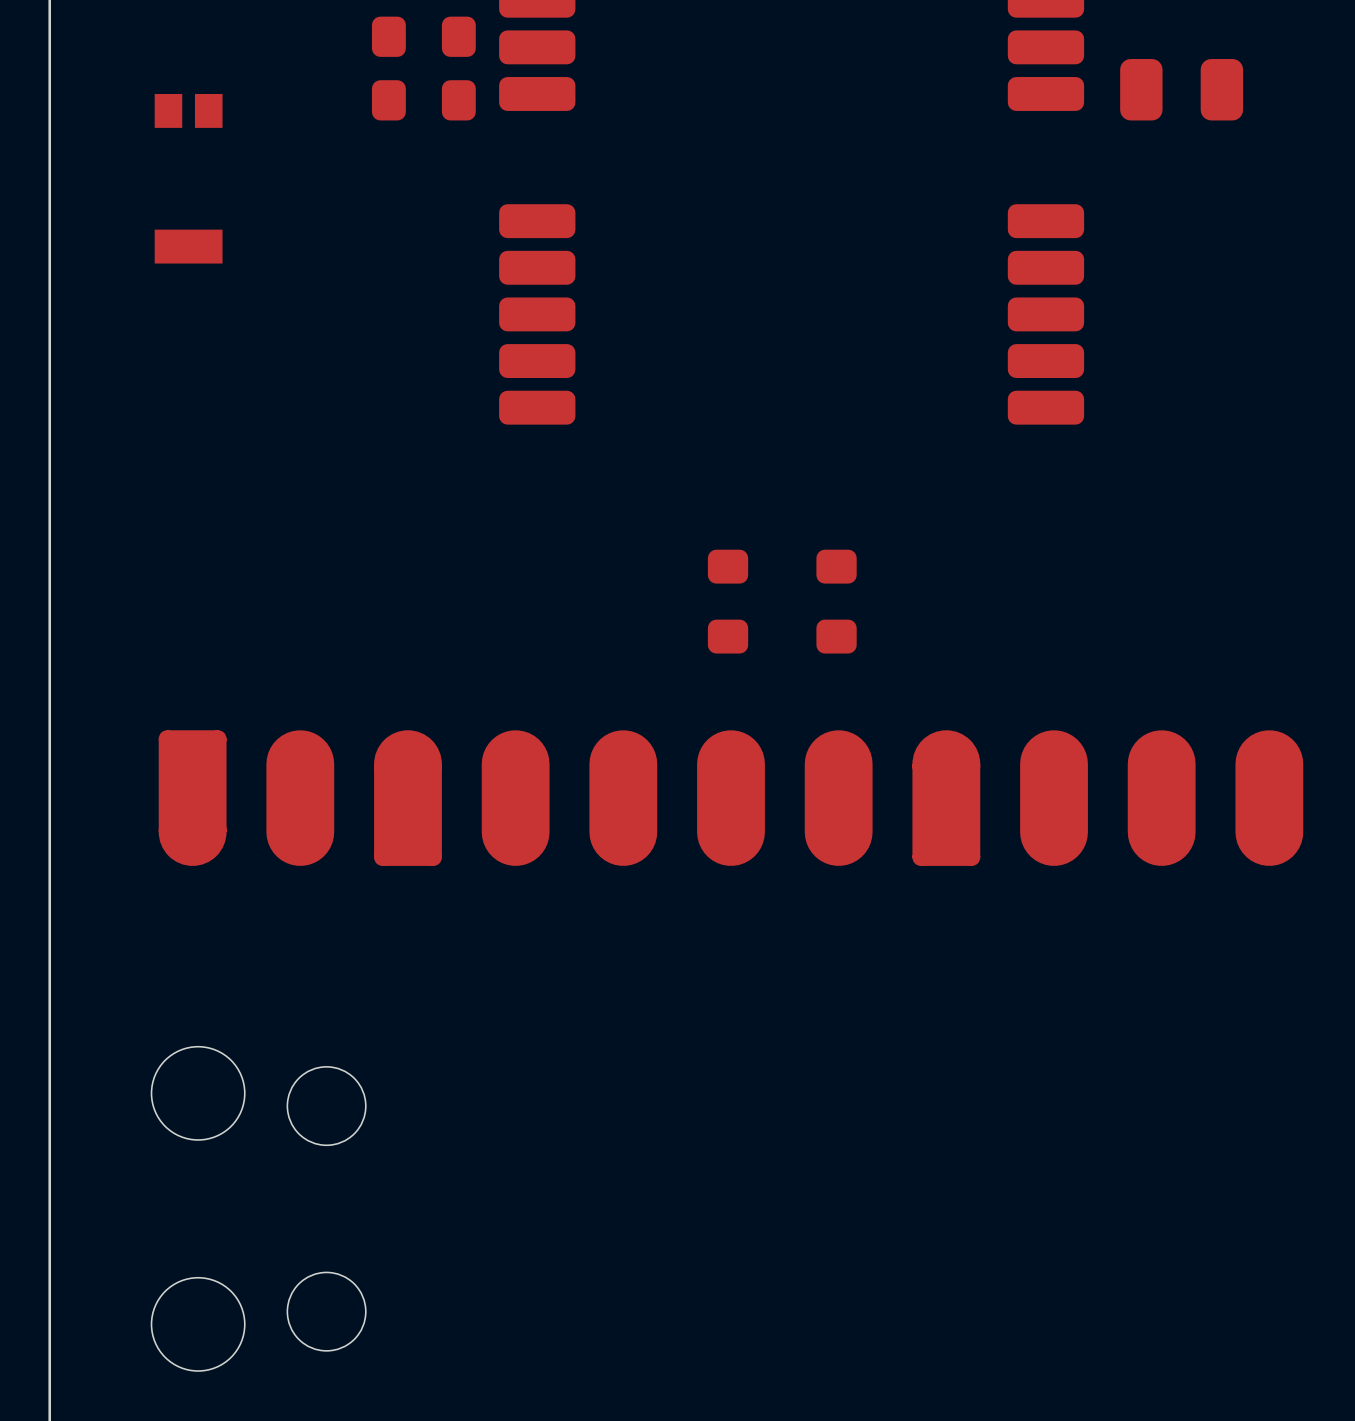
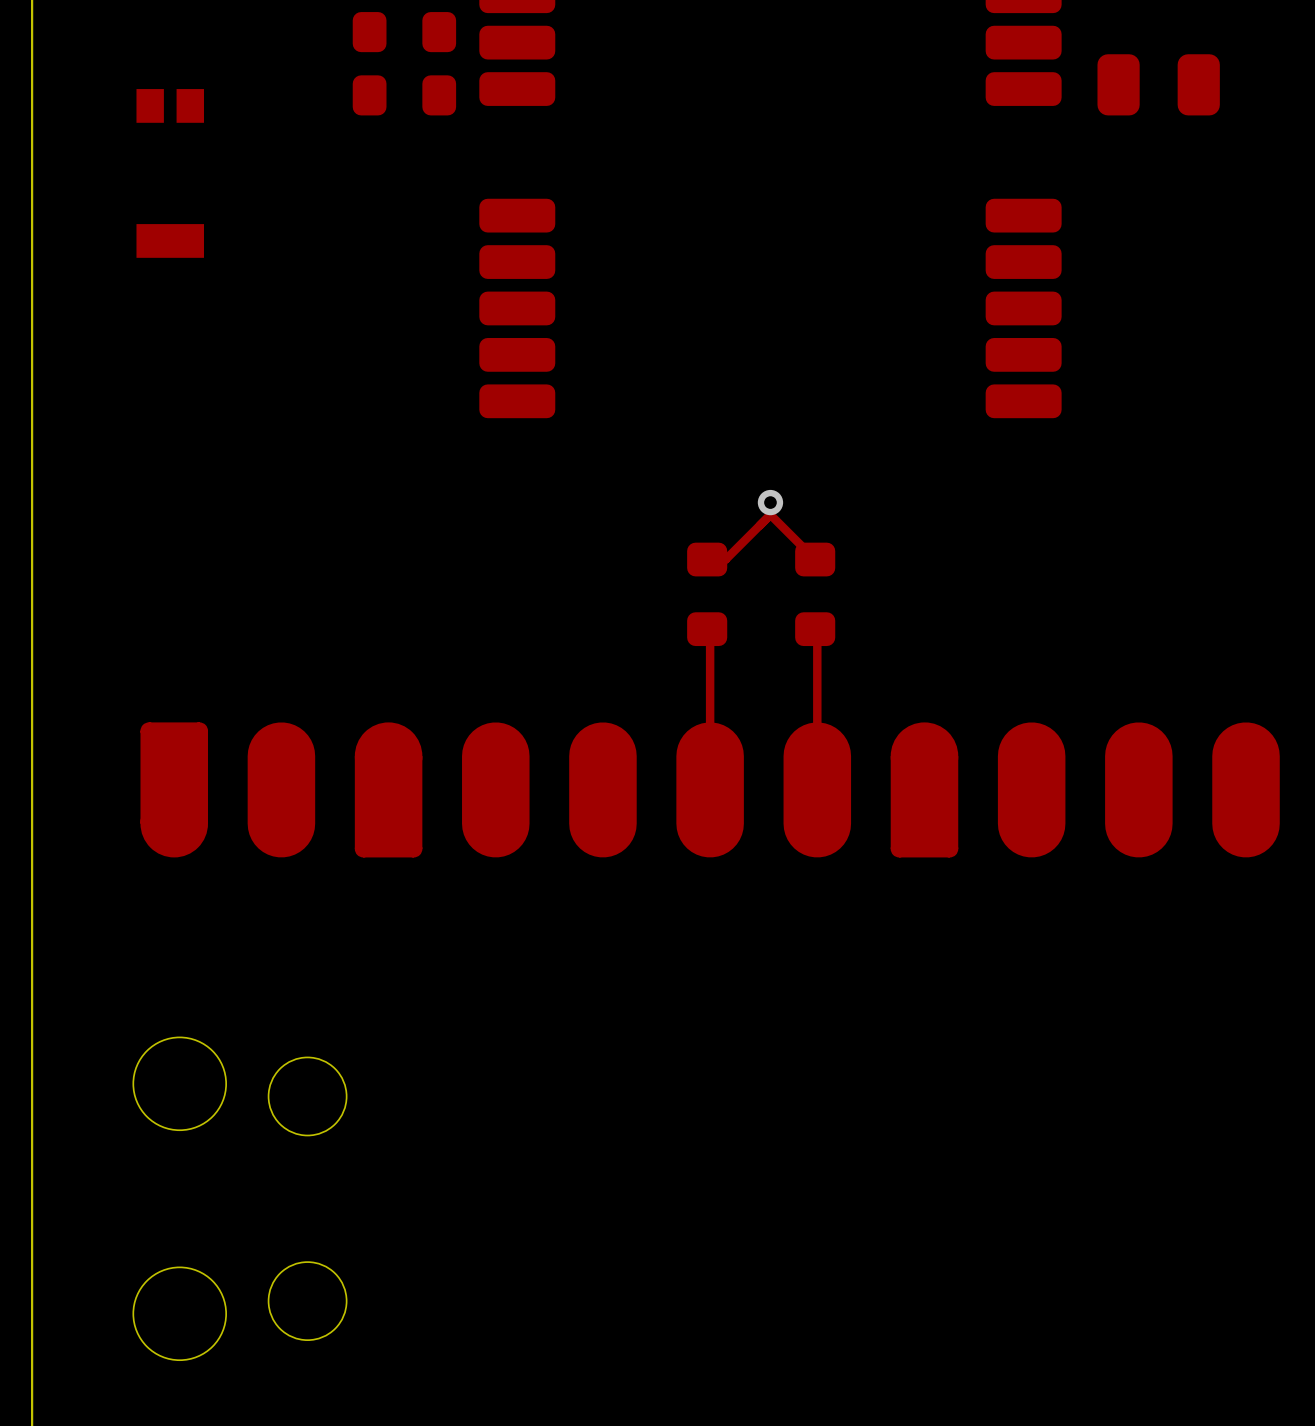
via: none -> (770, 502)
top track: none -> (770, 514) (725, 559) (707, 559)
top track: none -> (770, 514) (815, 559)
top track: none -> (707, 629) (710, 632) (710, 789)
top track: none -> (815, 629) (817, 631) (817, 789)

